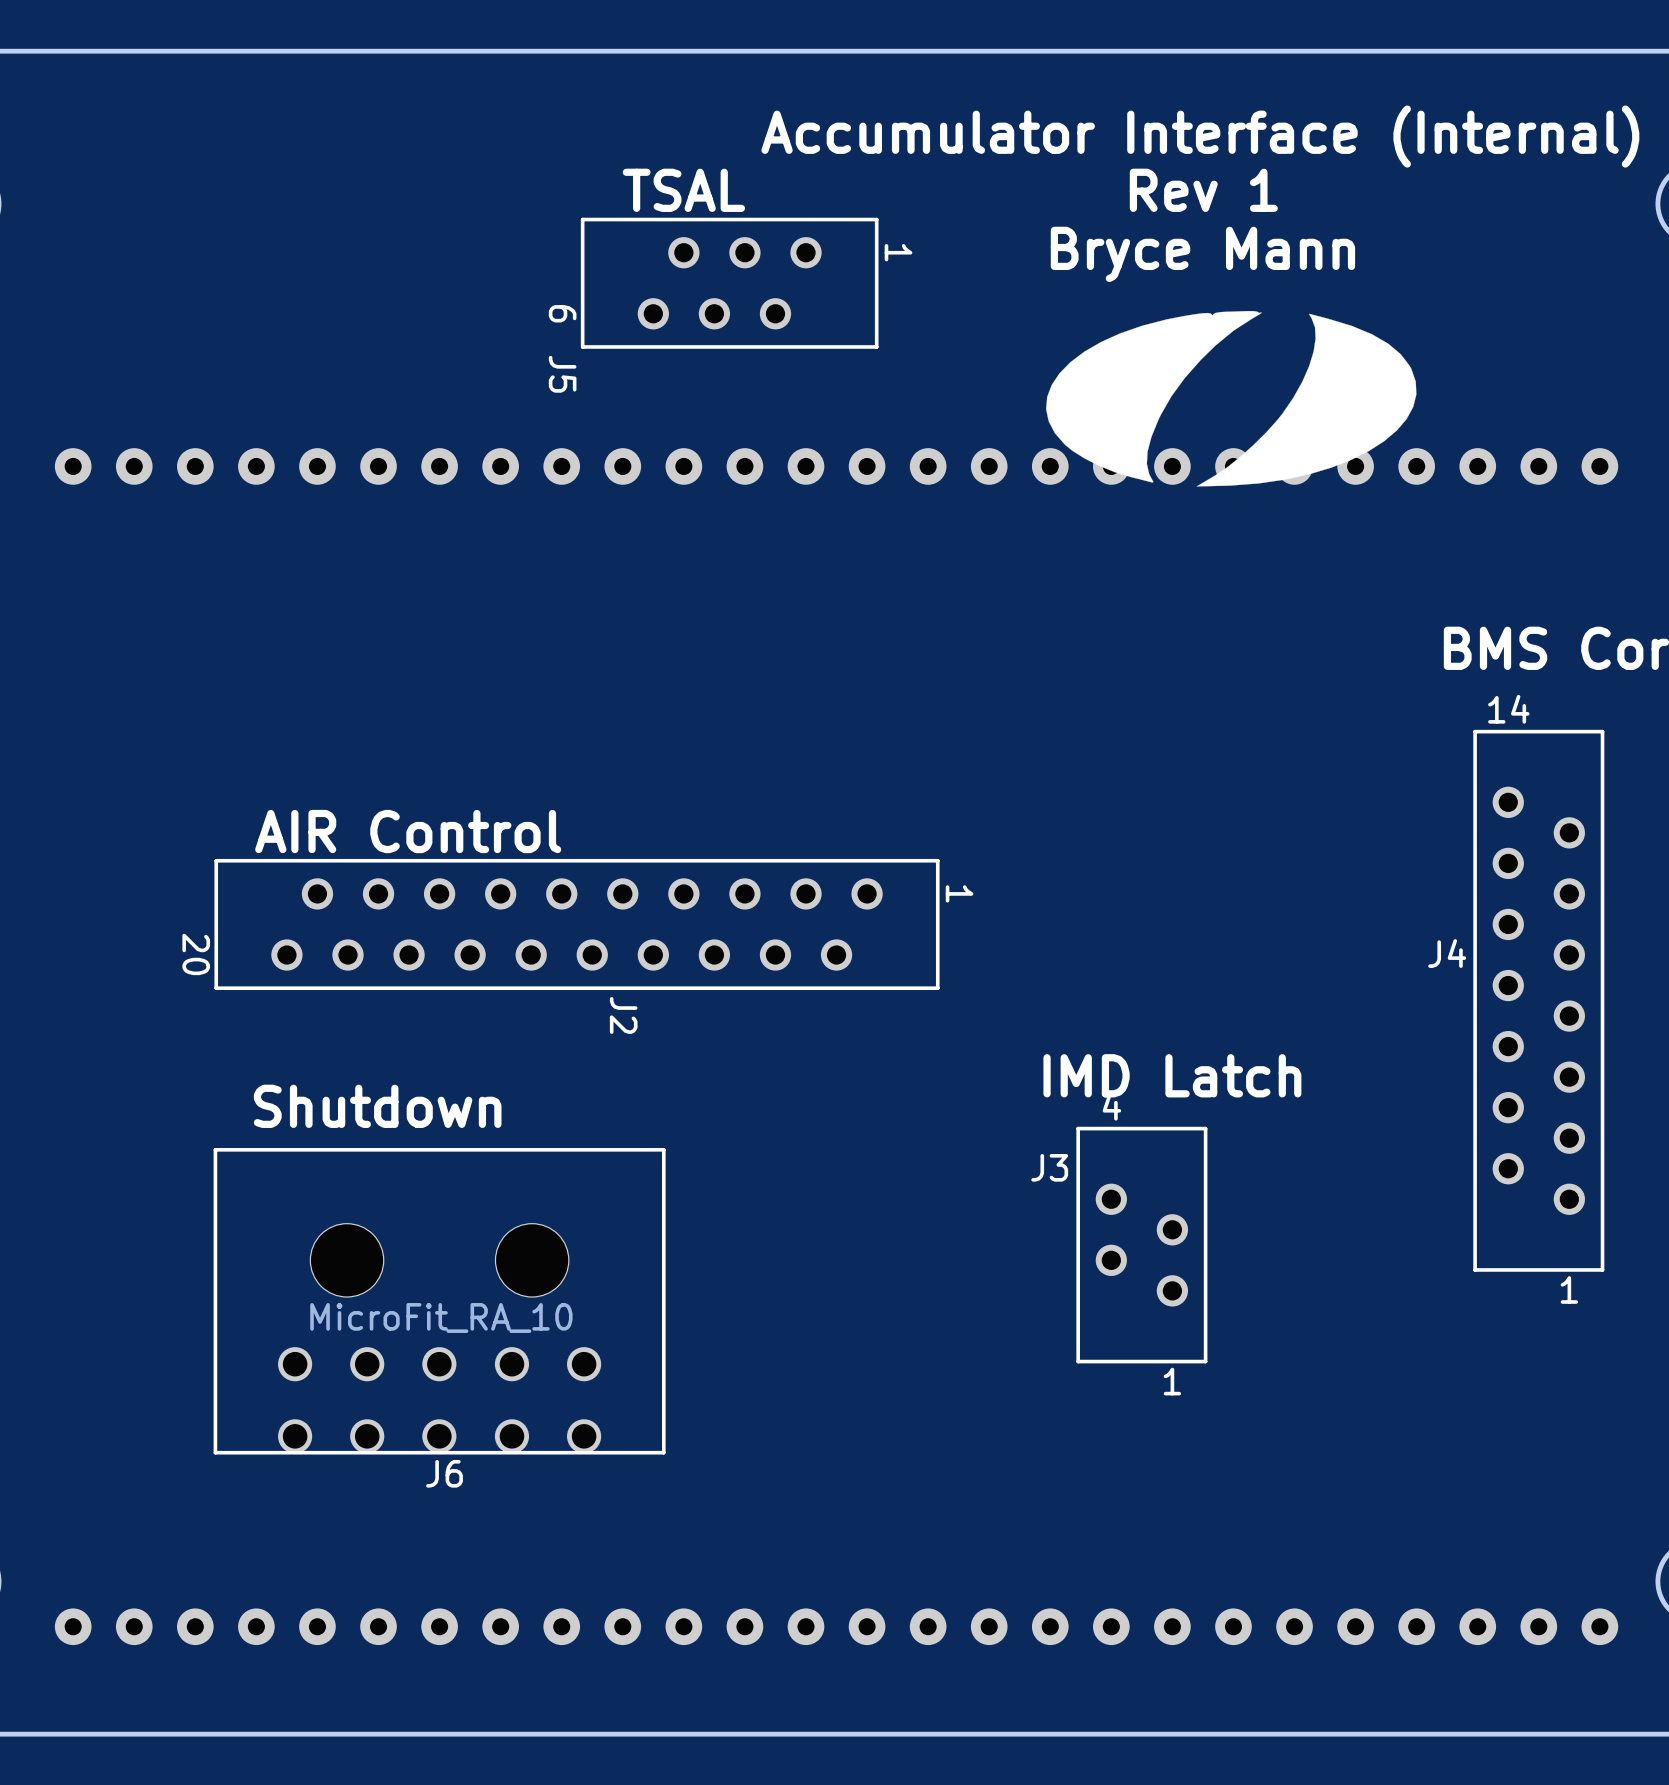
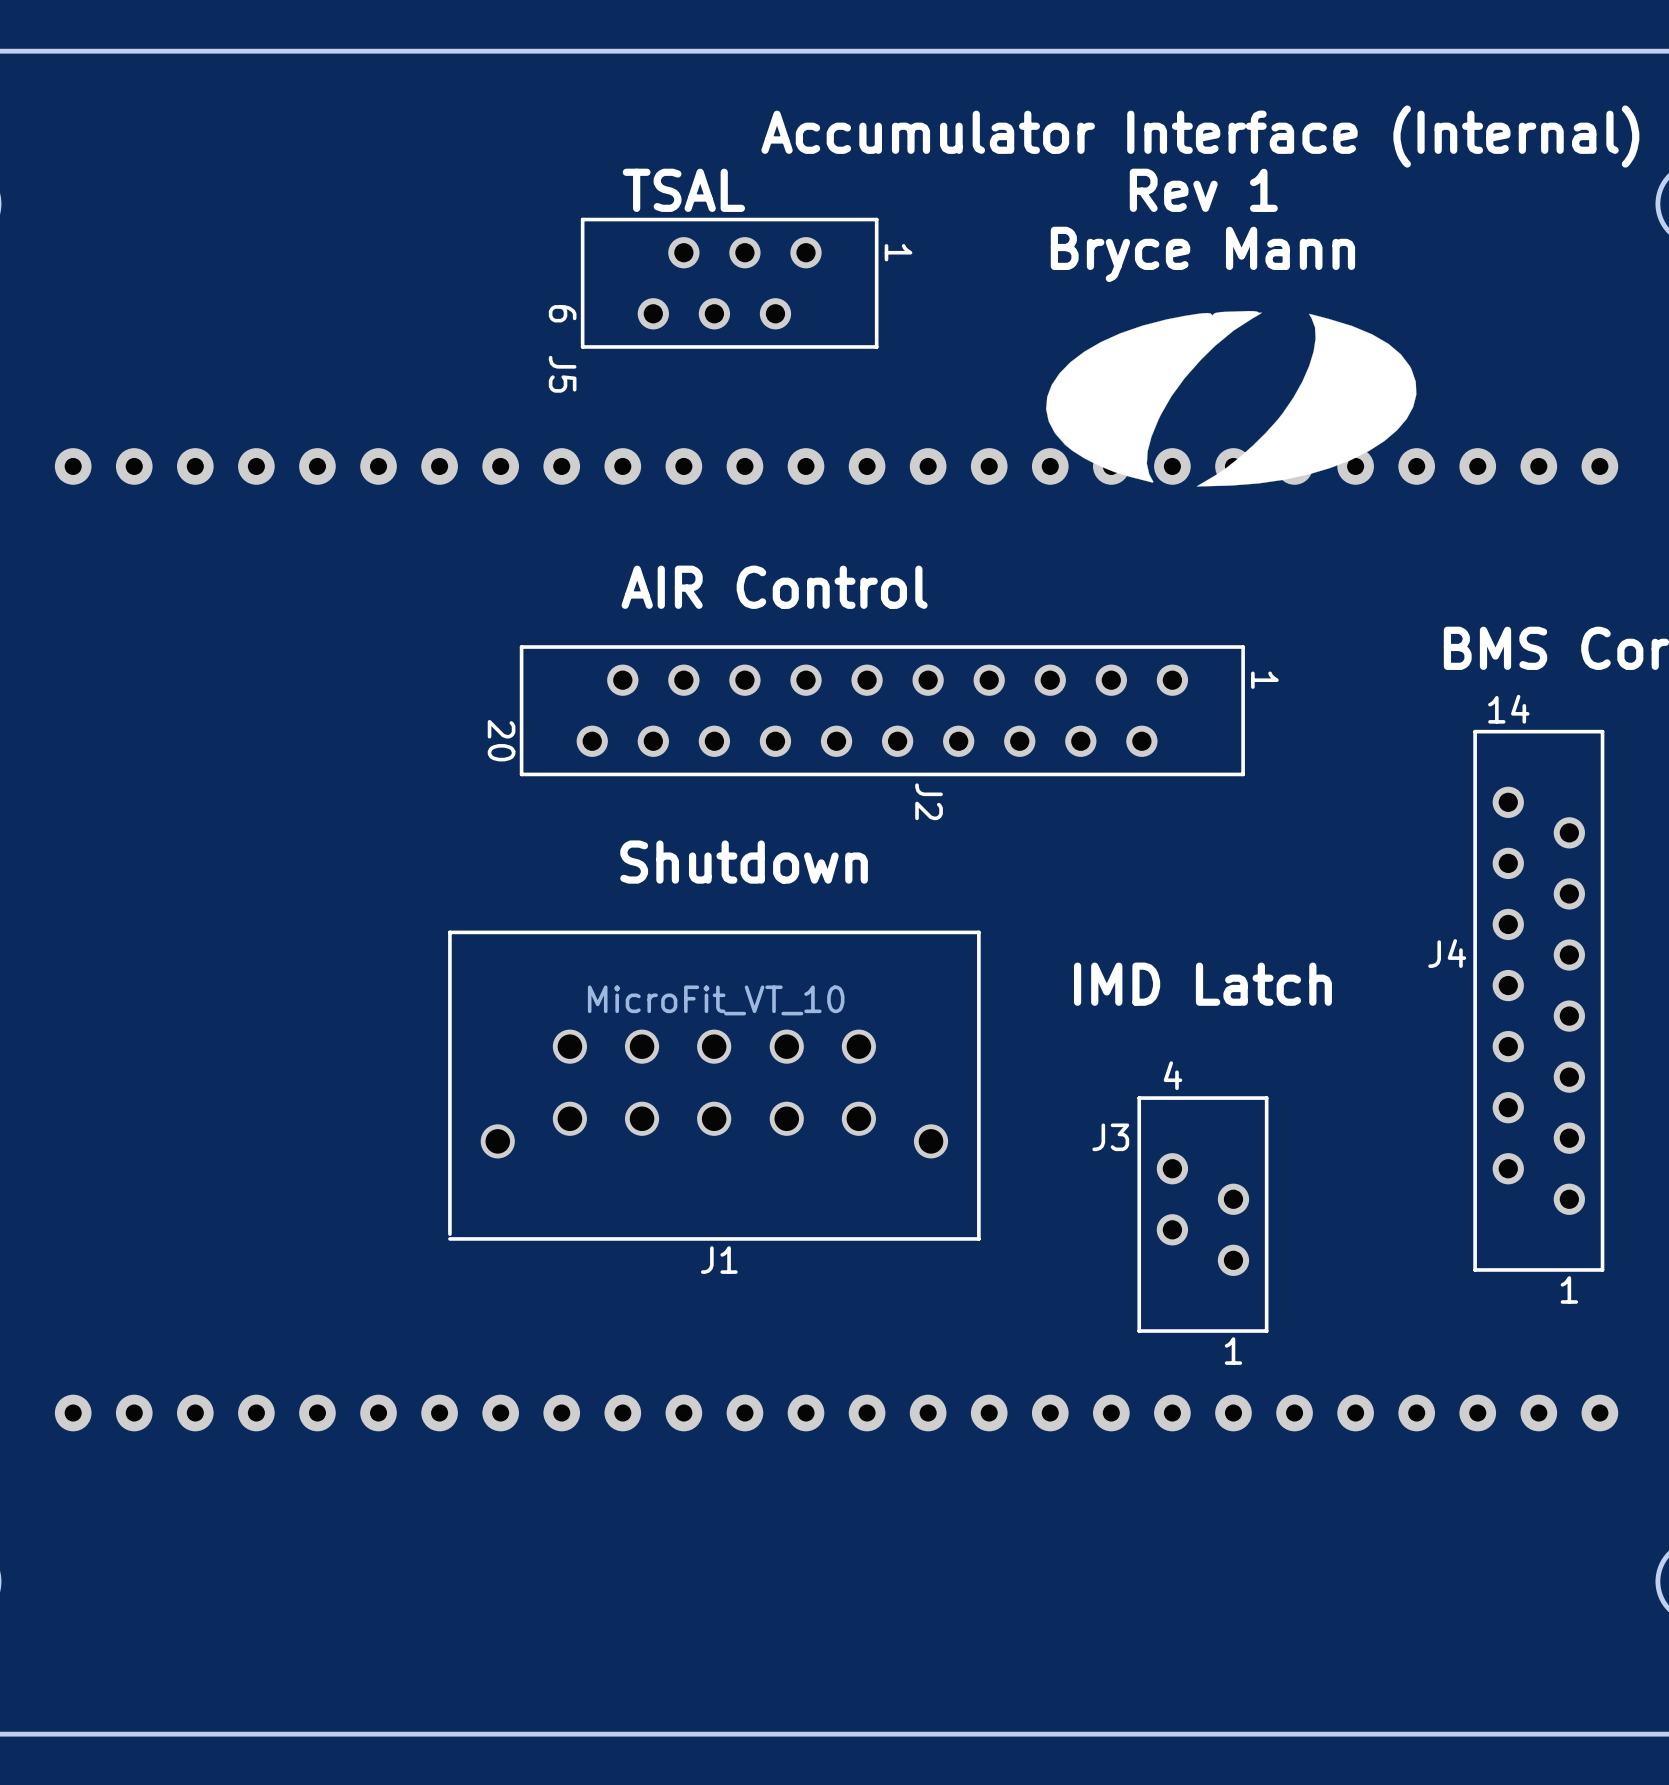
text position: AIR Control (408, 831) -> AIR Control (774, 587)
J2 position: (577, 924) -> (882, 710)
text position: IMD Latch (1172, 1075) -> IMD Latch (1202, 984)
J1: none -> MicroFit_VT_10 (714, 1085)
text position: Shutdown (377, 1106) -> Shutdown (744, 862)
J3 position: (1141, 1245) -> (1202, 1214)
J6: MicroFit_RA_10 (439, 1301) -> none
part position: (836, 1626) -> (836, 1413)

